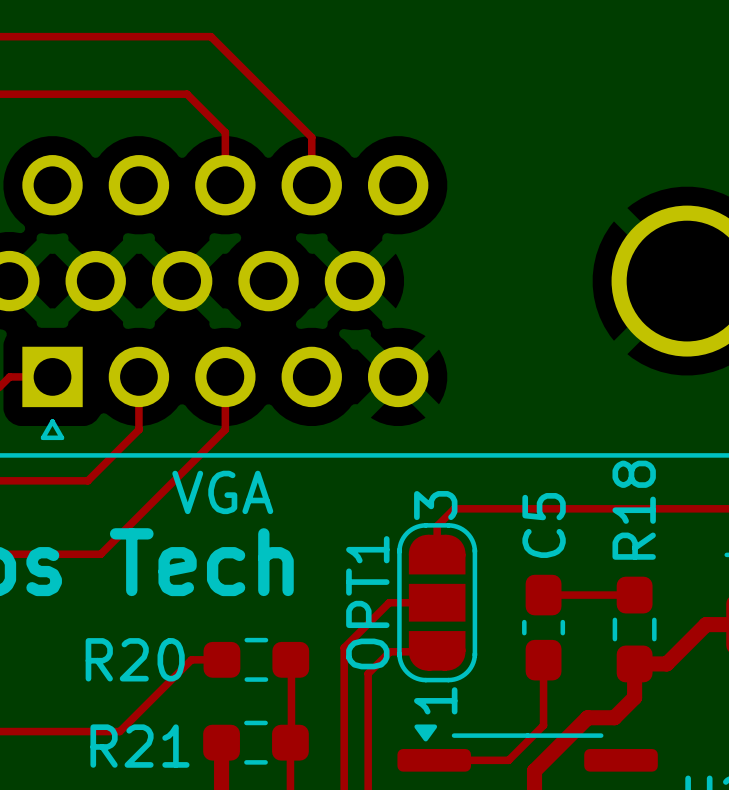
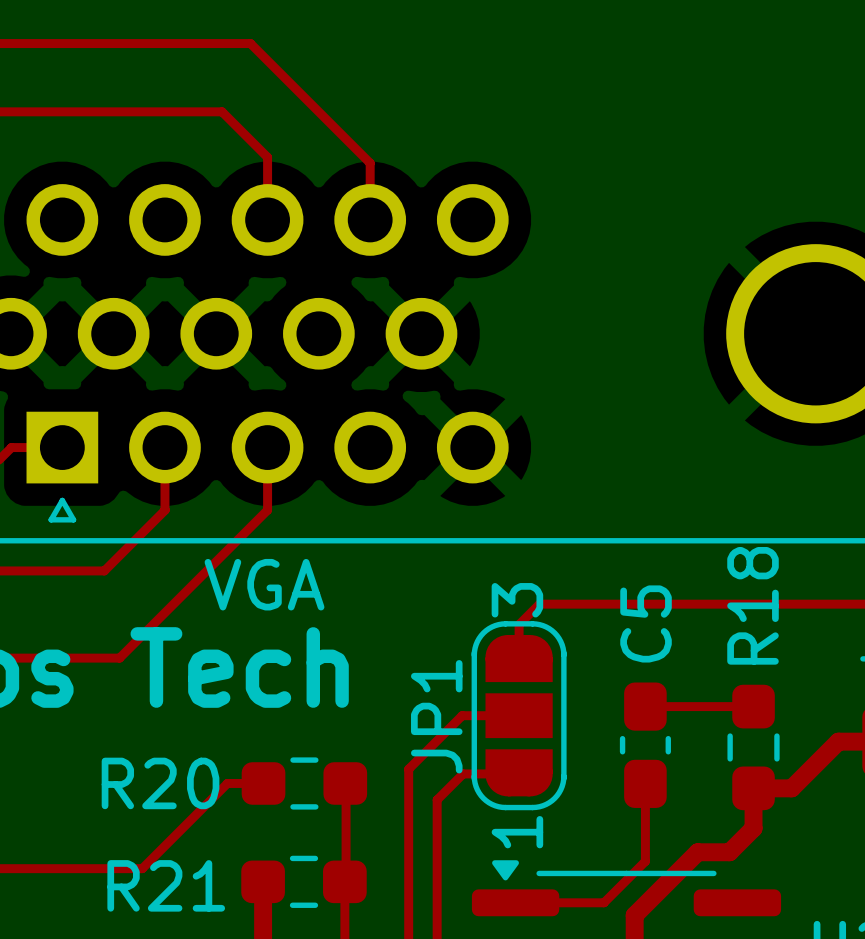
OPT1 name: OPT1 (367, 602) -> JP1 (436, 716)

